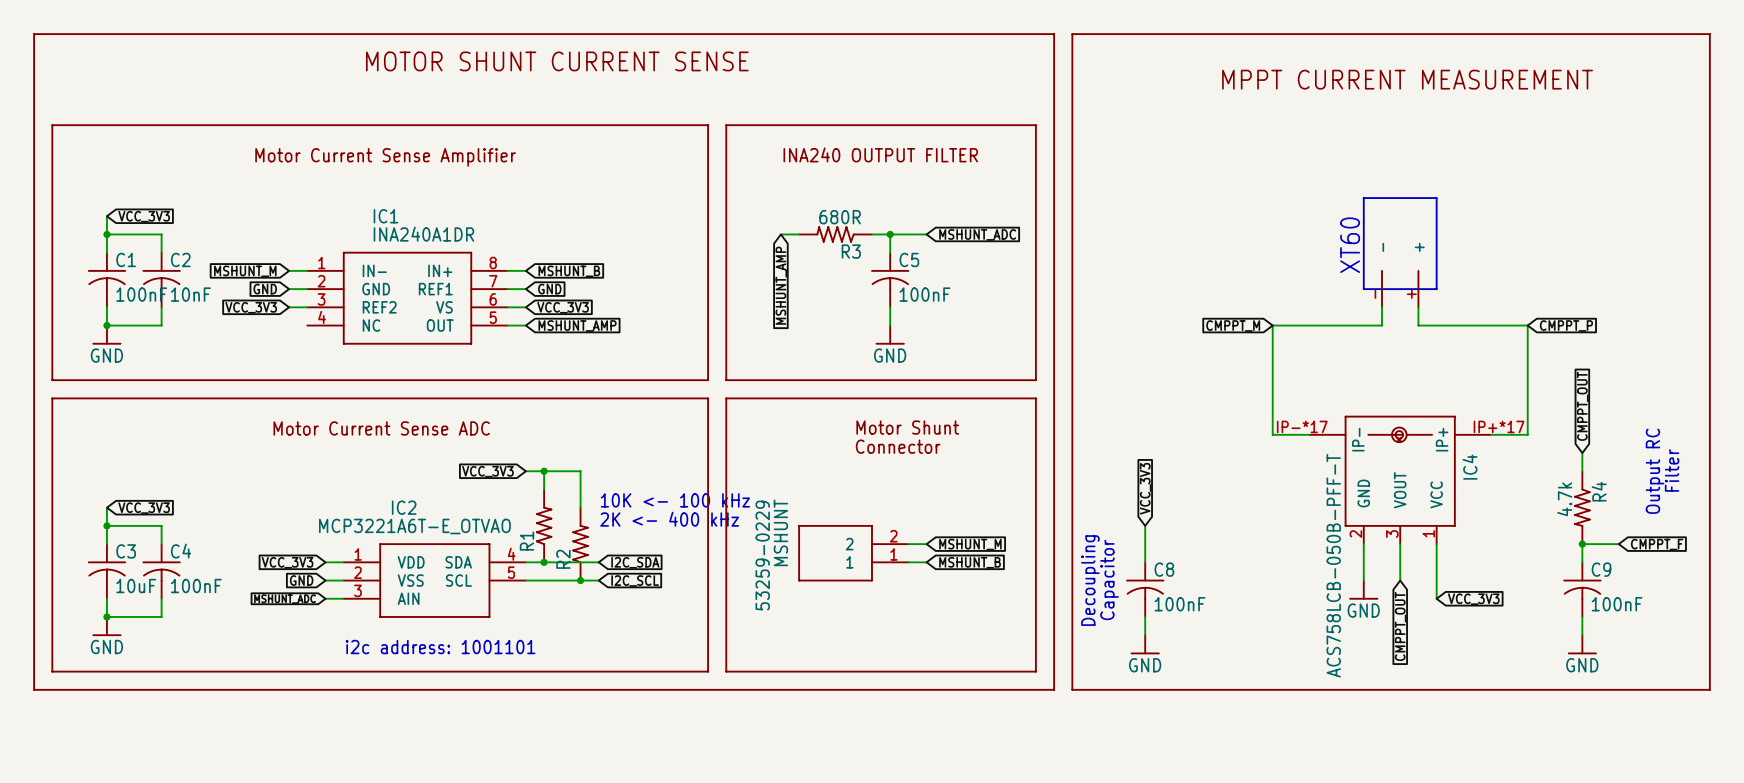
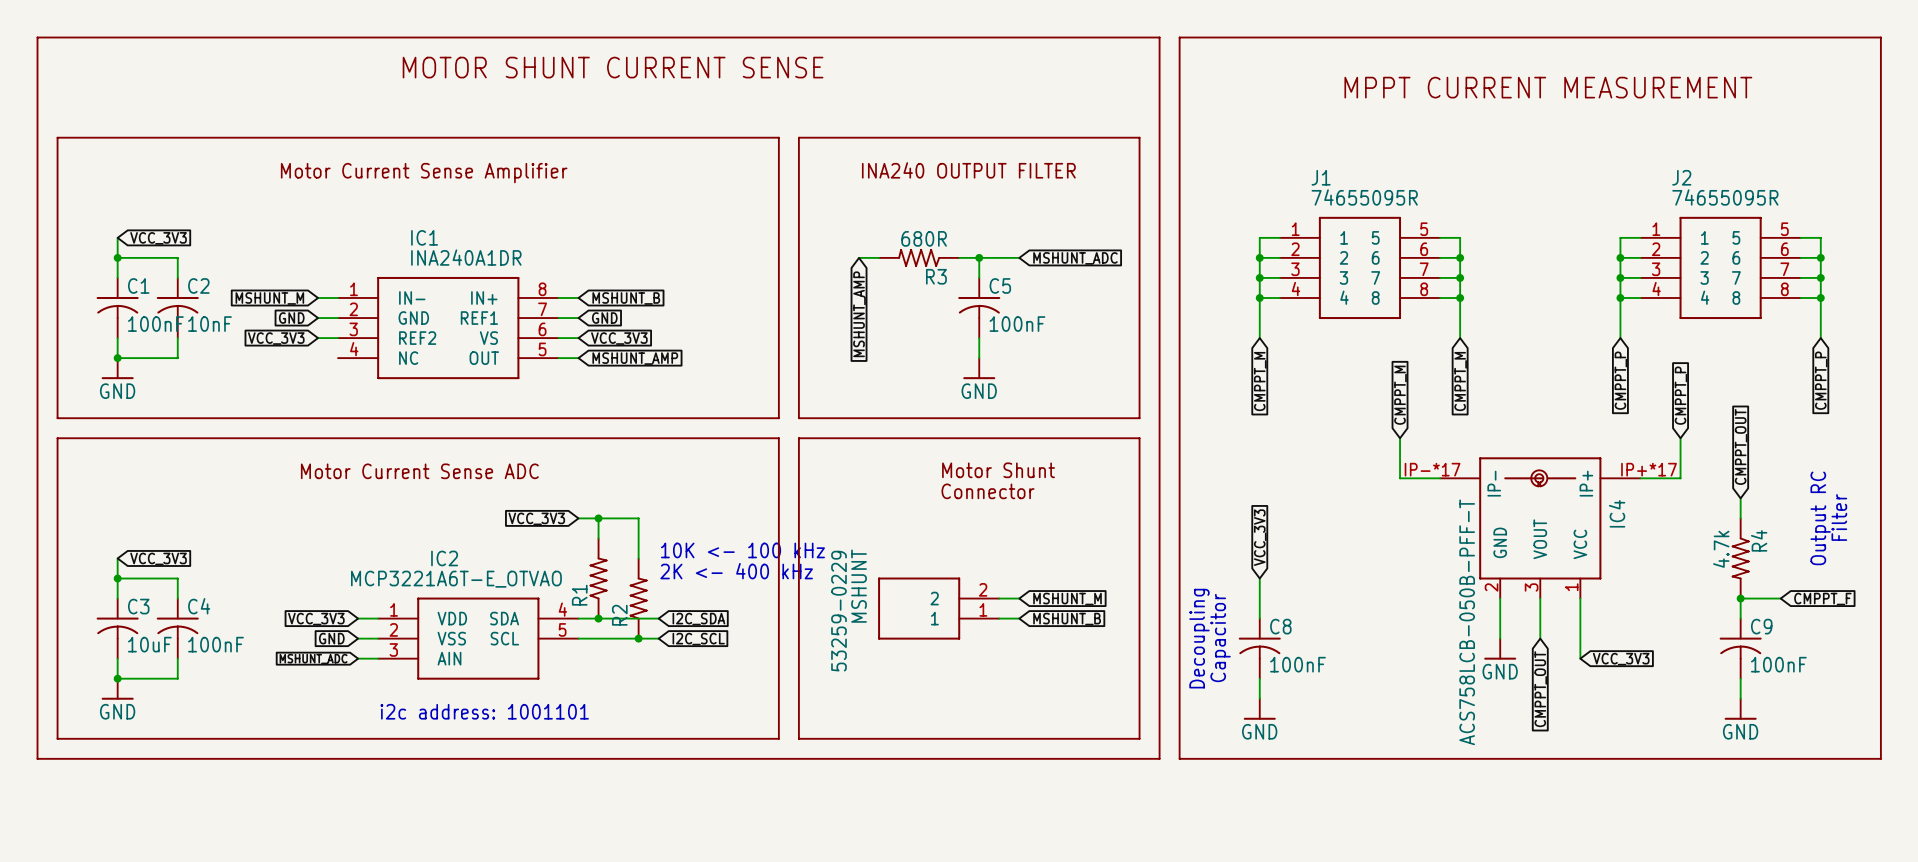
wire: none -> (1279, 237) (1259, 237) (1259, 338)
wire: none -> (1440, 237) (1460, 237) (1460, 338)
wire: none -> (1640, 237) (1620, 237) (1620, 338)
wire: none -> (1800, 237) (1820, 237) (1820, 338)
wire: none -> (1259, 257) (1279, 257)
junction: none -> (1259, 257)
wire: none -> (1440, 257) (1460, 257)
junction: none -> (1460, 257)
wire: none -> (1620, 257) (1640, 257)
junction: none -> (1620, 257)
wire: none -> (1800, 257) (1820, 257)
junction: none -> (1820, 257)
J1: none -> 74655095R (1359, 267)
J2: none -> 74655095R (1720, 267)
wire: none -> (1259, 277) (1279, 277)
junction: none -> (1259, 277)
wire: none -> (1440, 277) (1460, 277)
junction: none -> (1460, 277)
part: (1400, 252) -> none
wire: none -> (1620, 277) (1640, 277)
junction: none -> (1620, 277)
wire: none -> (1800, 277) (1820, 277)
junction: none -> (1820, 277)
wire: none -> (1259, 297) (1279, 297)
junction: none -> (1259, 297)
wire: none -> (1440, 297) (1460, 297)
junction: none -> (1460, 297)
wire: none -> (1620, 297) (1640, 297)
junction: none -> (1620, 297)
wire: none -> (1800, 297) (1820, 297)
junction: none -> (1820, 297)
wire: (1382, 307) (1382, 325) (1272, 325) (1272, 398) -> none
wire: (1418, 307) (1418, 325) (1527, 325) (1527, 398) -> none
global label rotation: 0° (1233, 325) -> 90° clockwise (1400, 395)
global label rotation: 0° (1566, 325) -> 90° counterclockwise (1681, 395)
global label: none -> CMPPT_M (1260, 381)
global label: none -> CMPPT_M (1460, 381)
global label: none -> CMPPT_P (1620, 380)
global label: none -> CMPPT_P (1821, 380)

